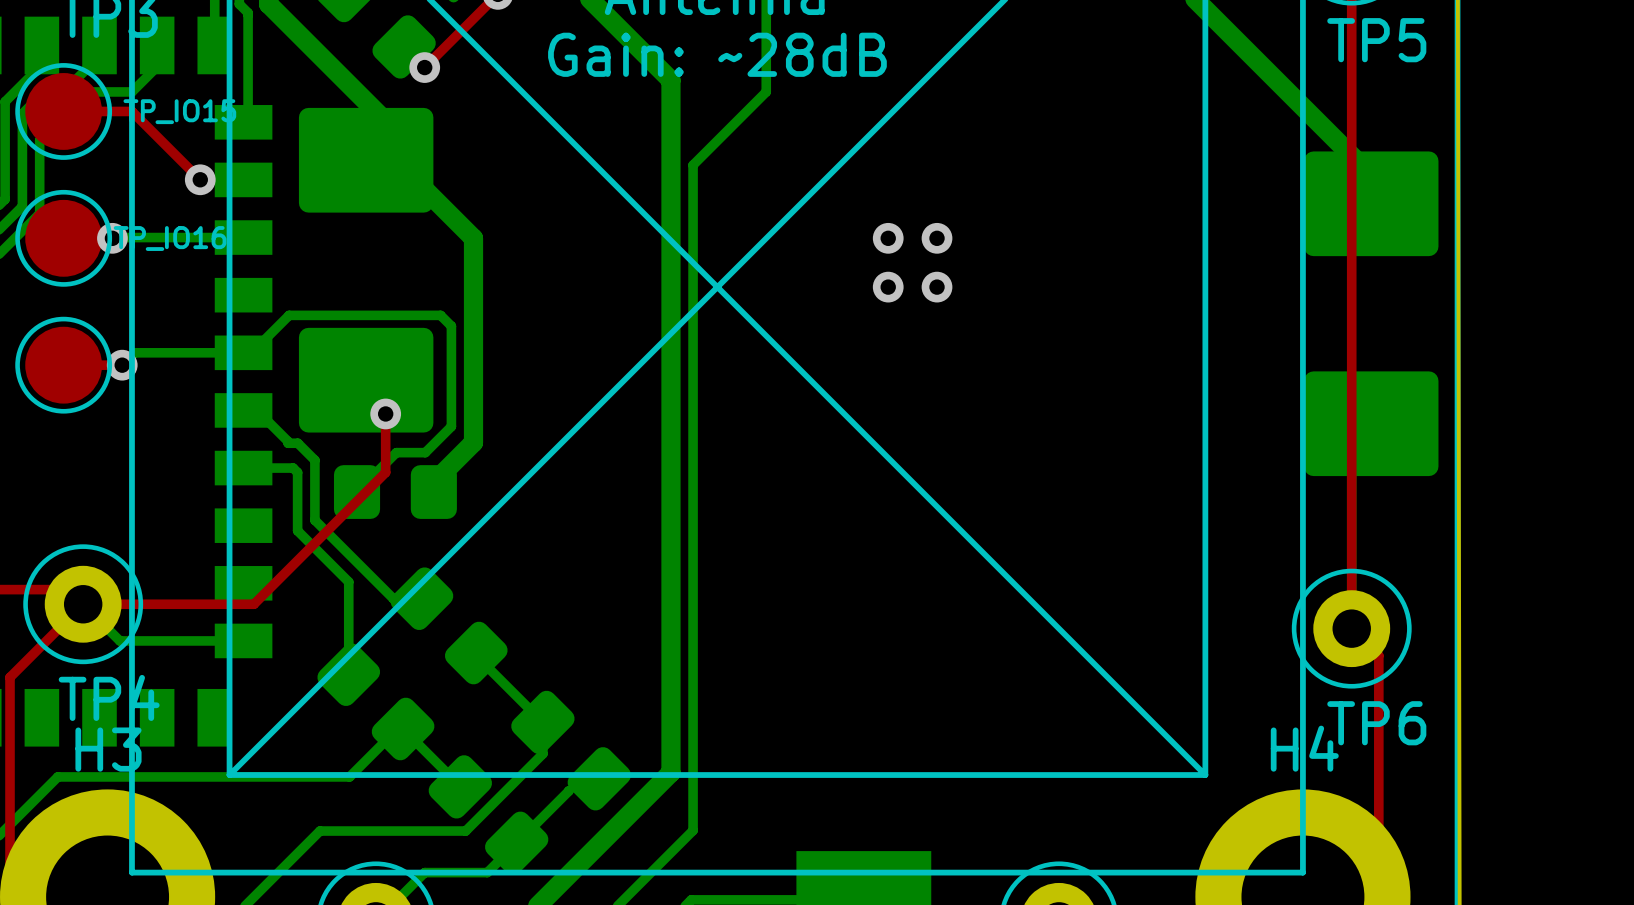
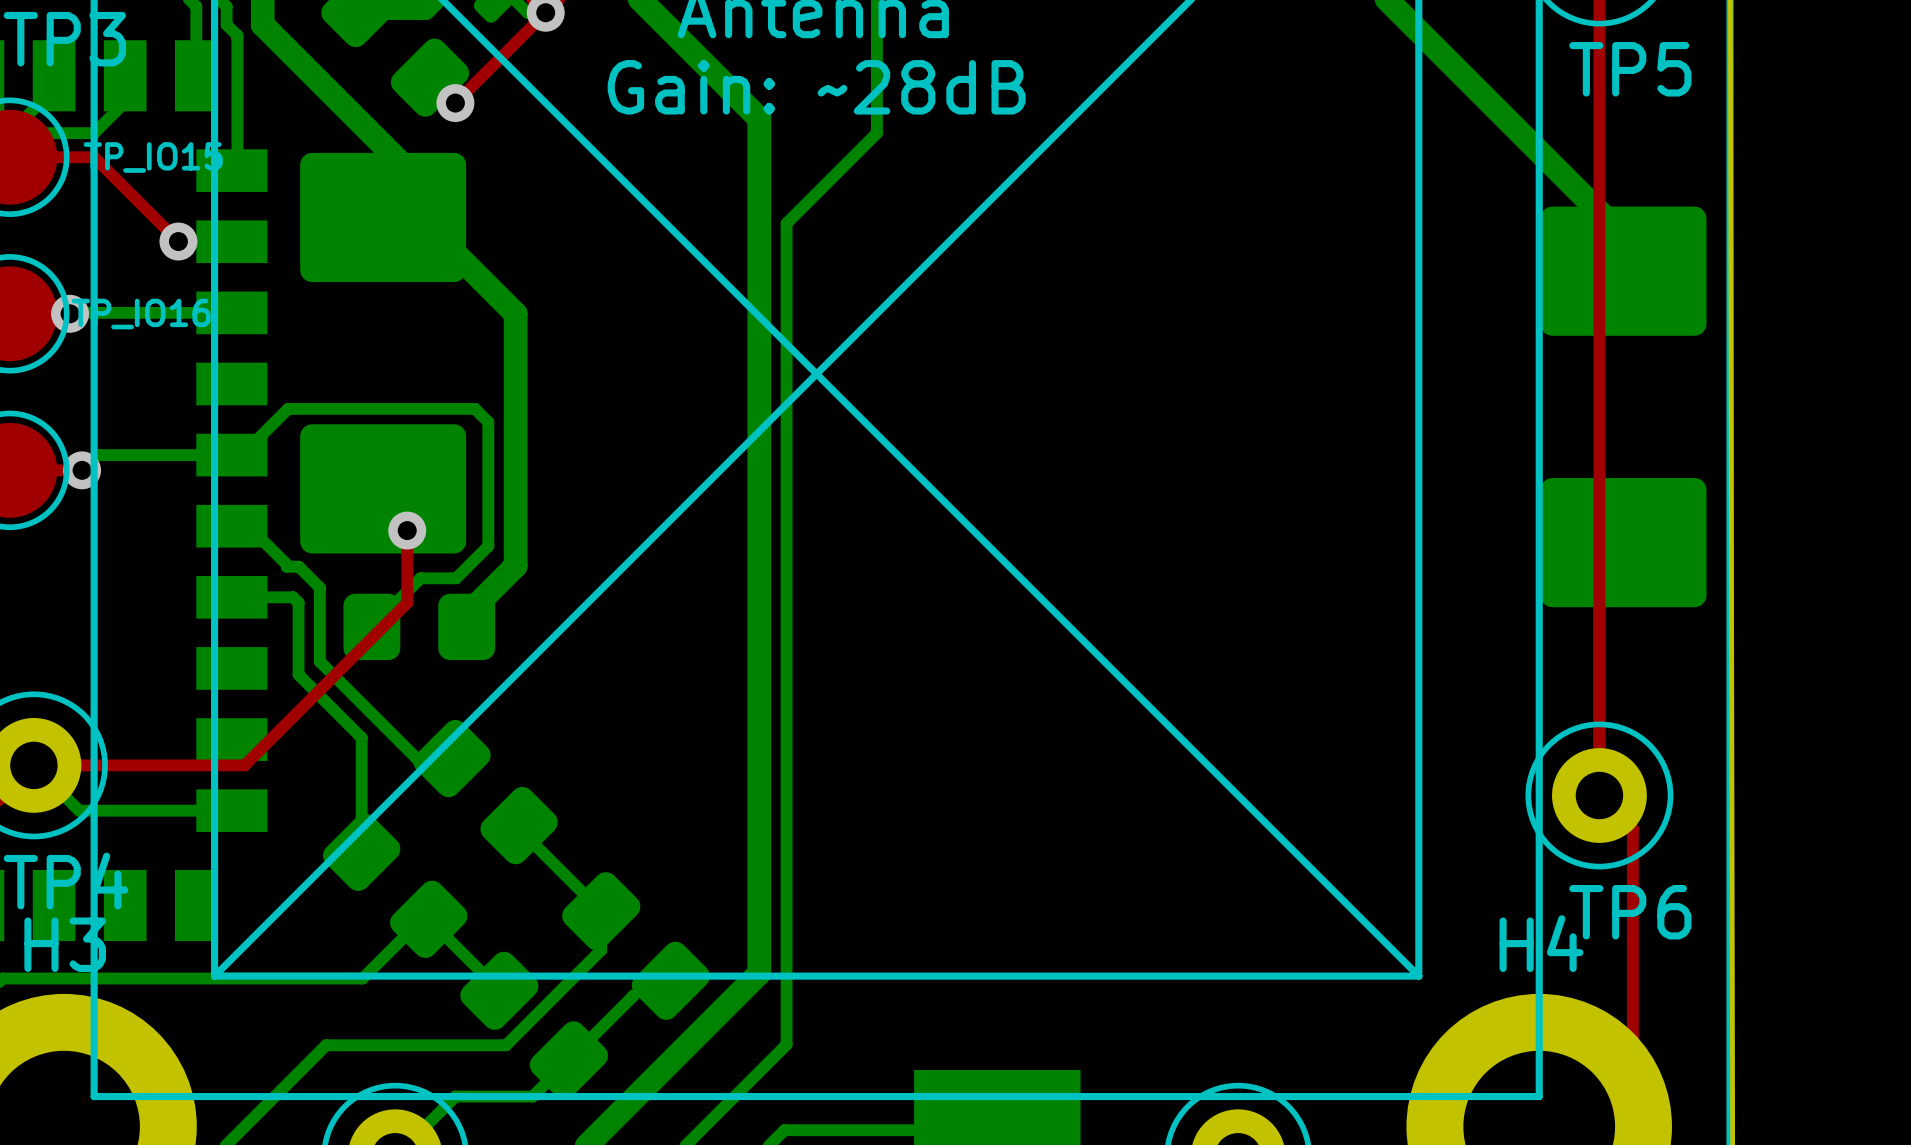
via: (888, 238) -> none
via: (937, 238) -> none
via: (888, 287) -> none
via: (937, 287) -> none

